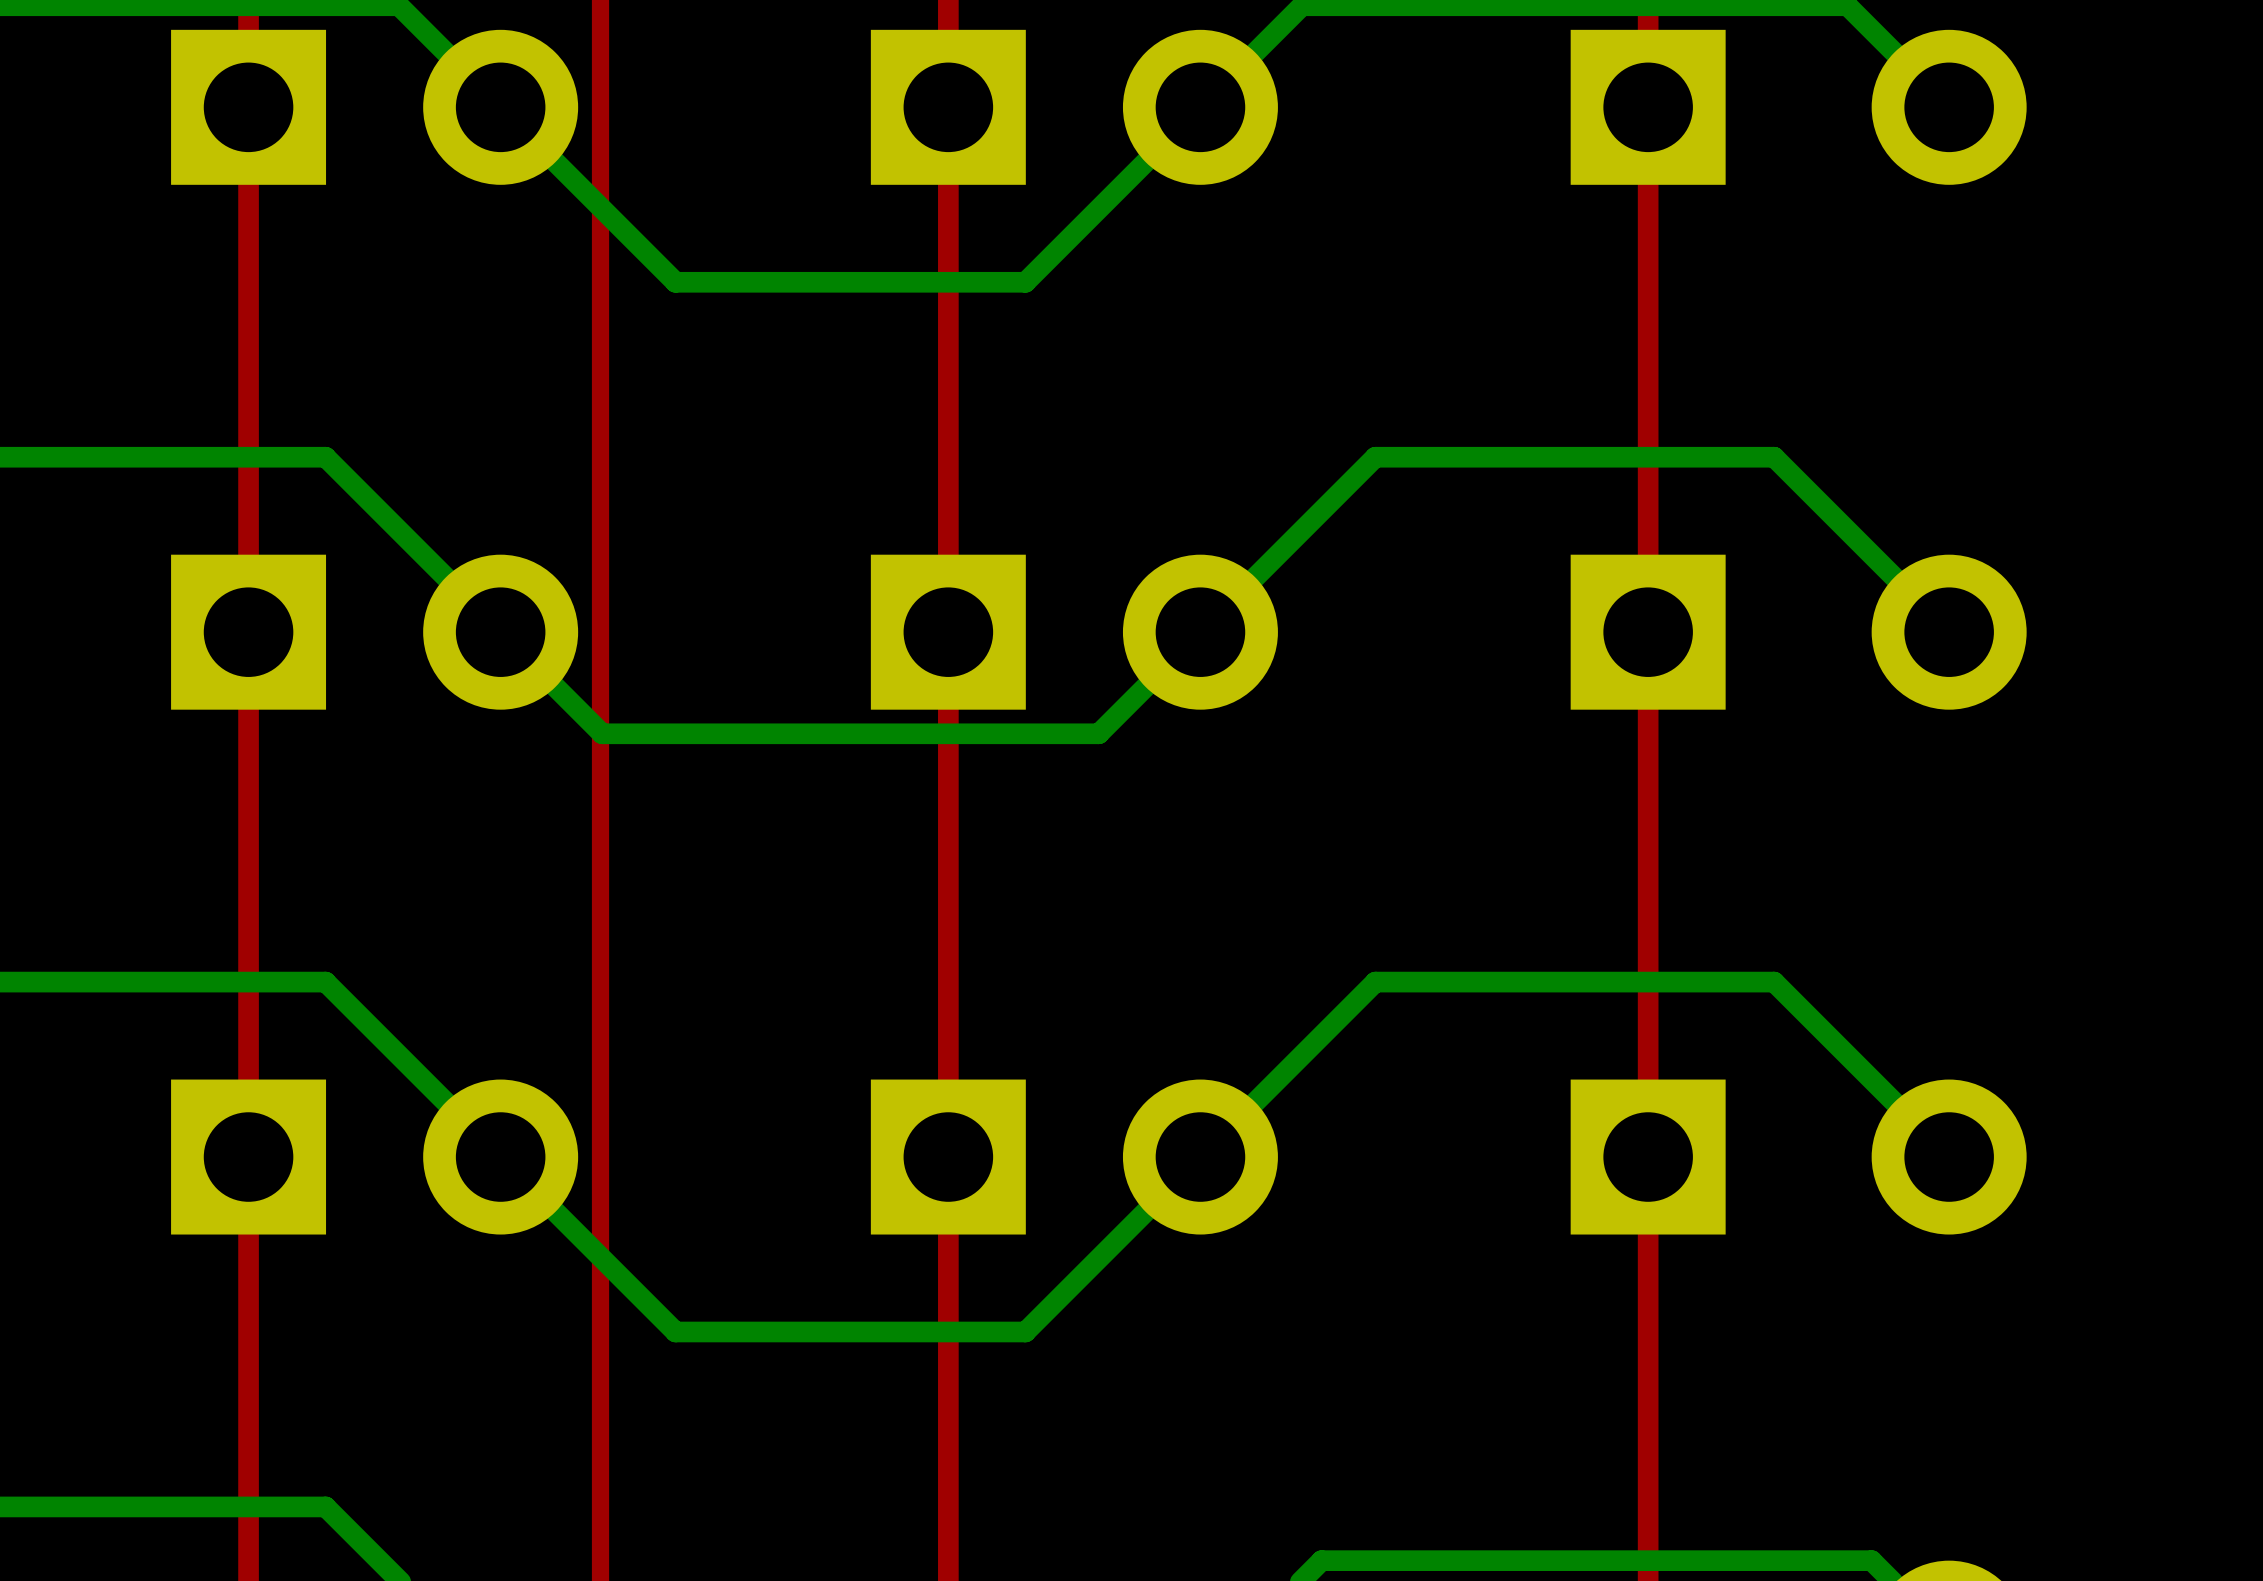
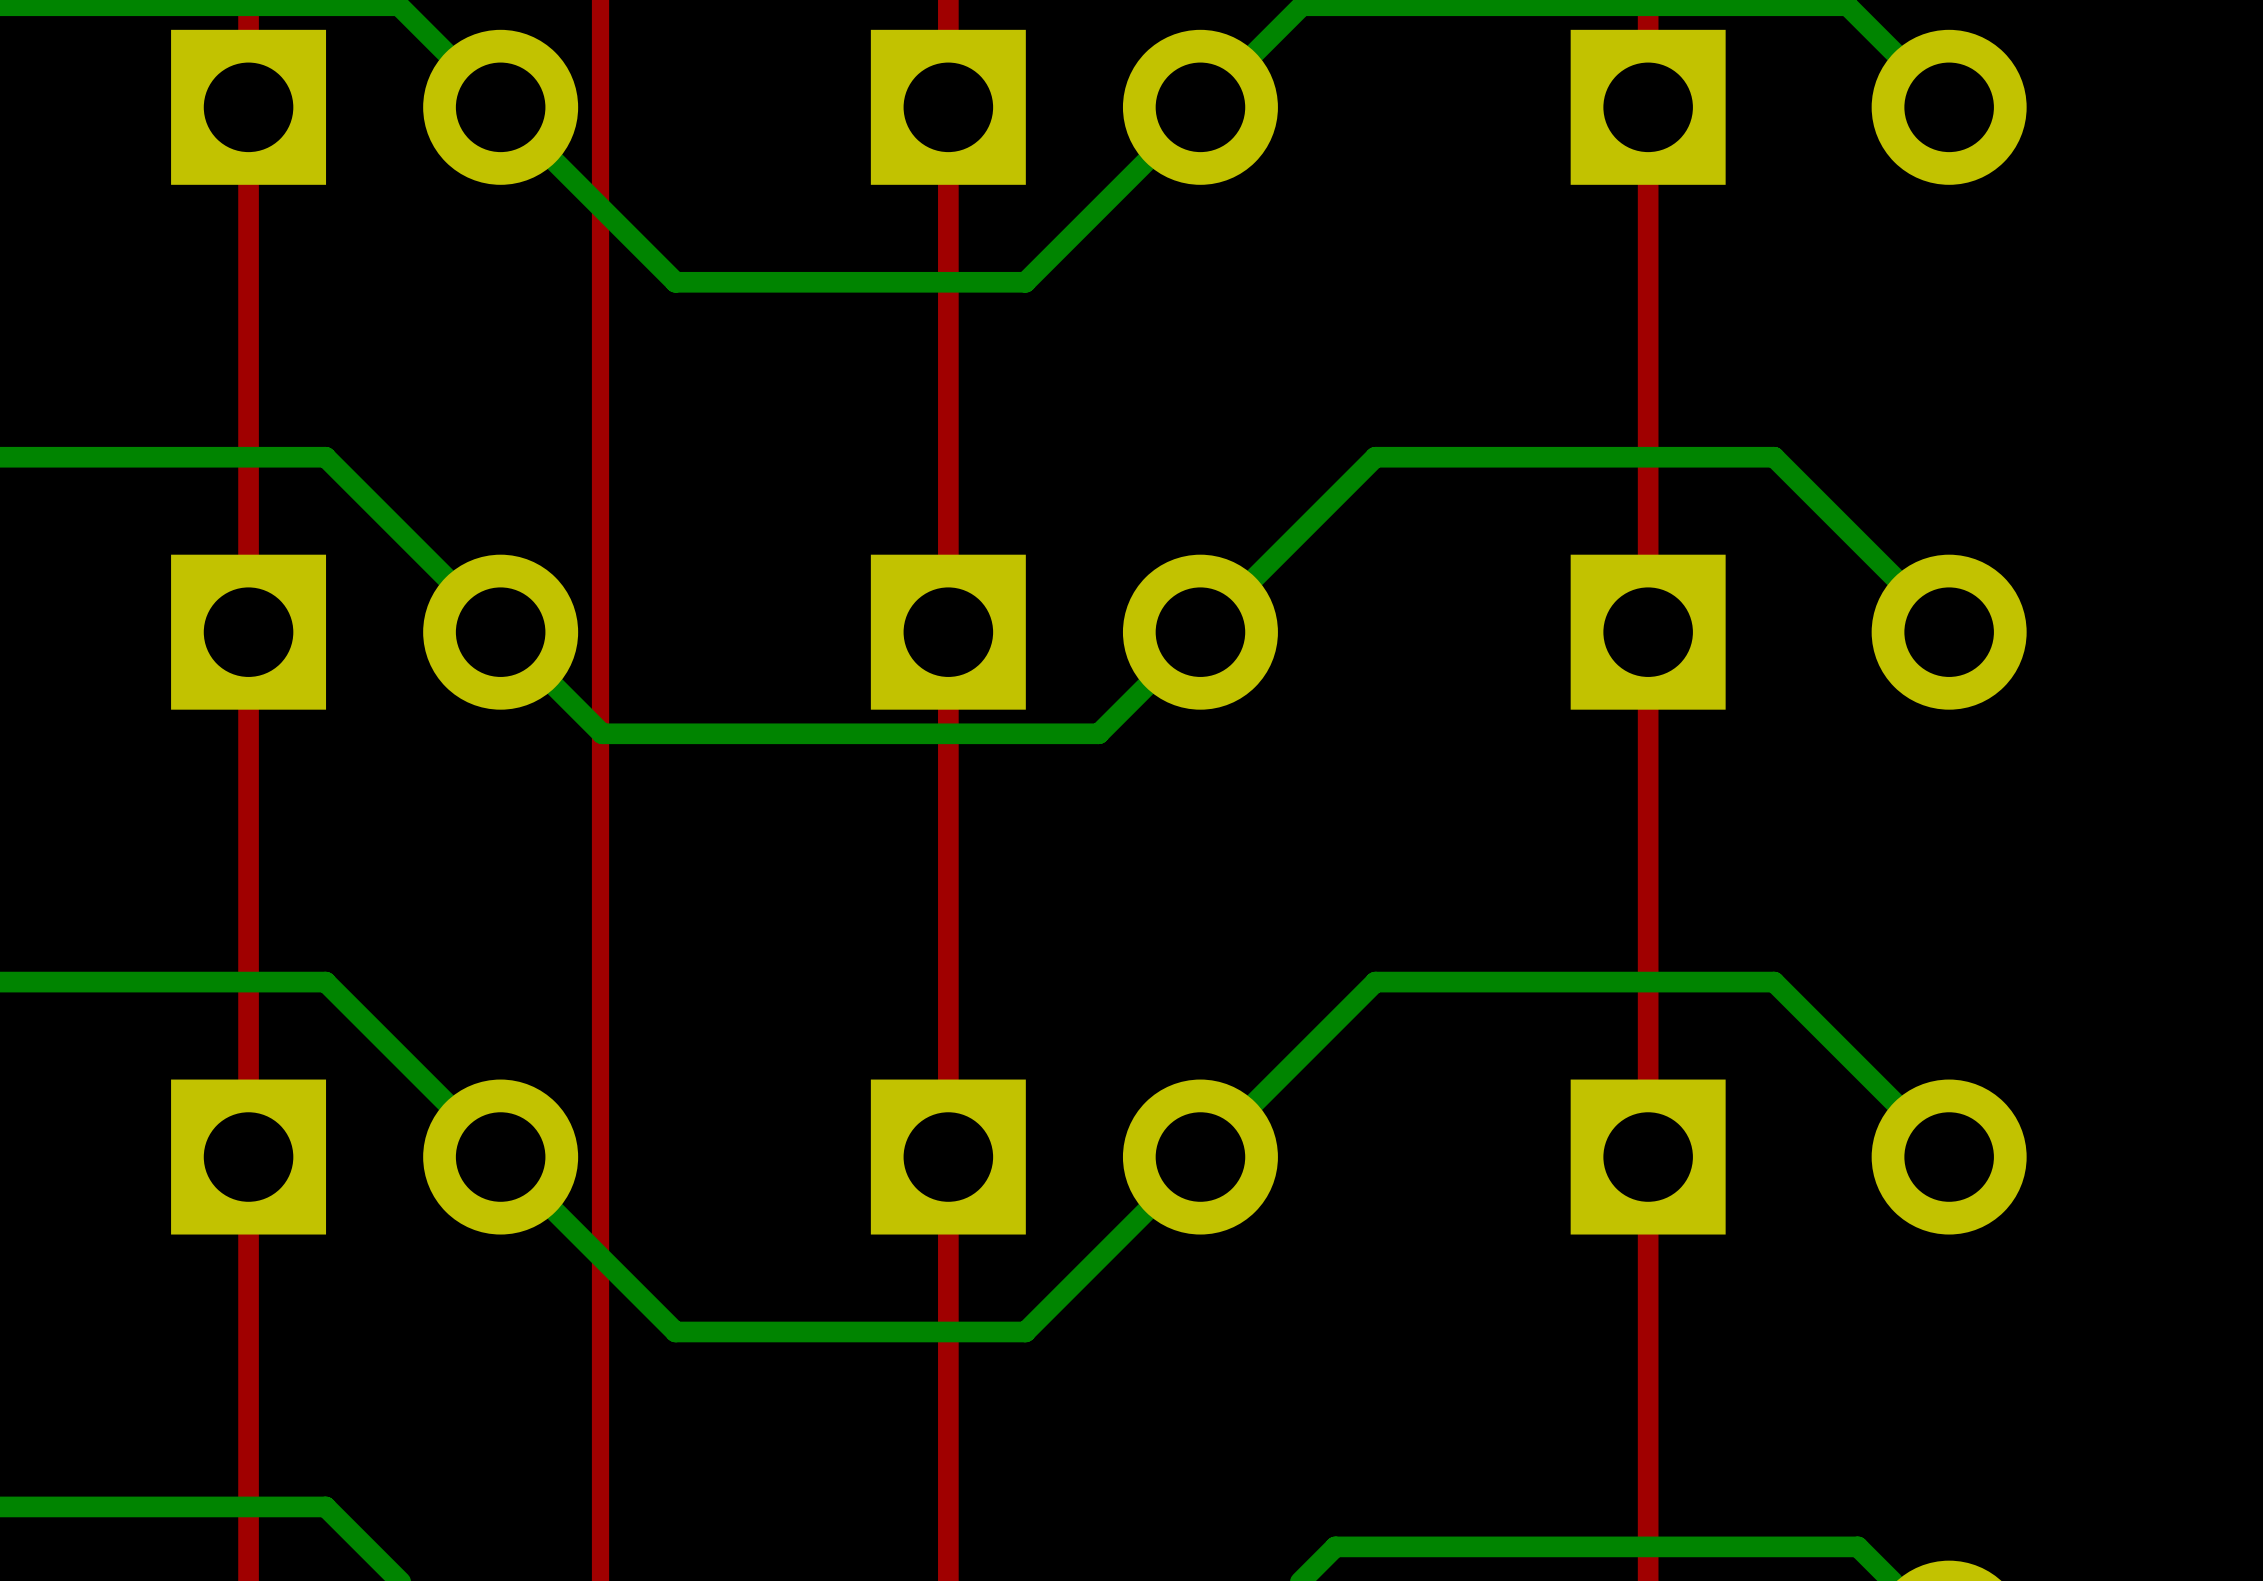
bottom track: (1871, 1560) (1321, 1560) -> (1871, 1560) (1857, 1546) (1335, 1546) (1321, 1560)

